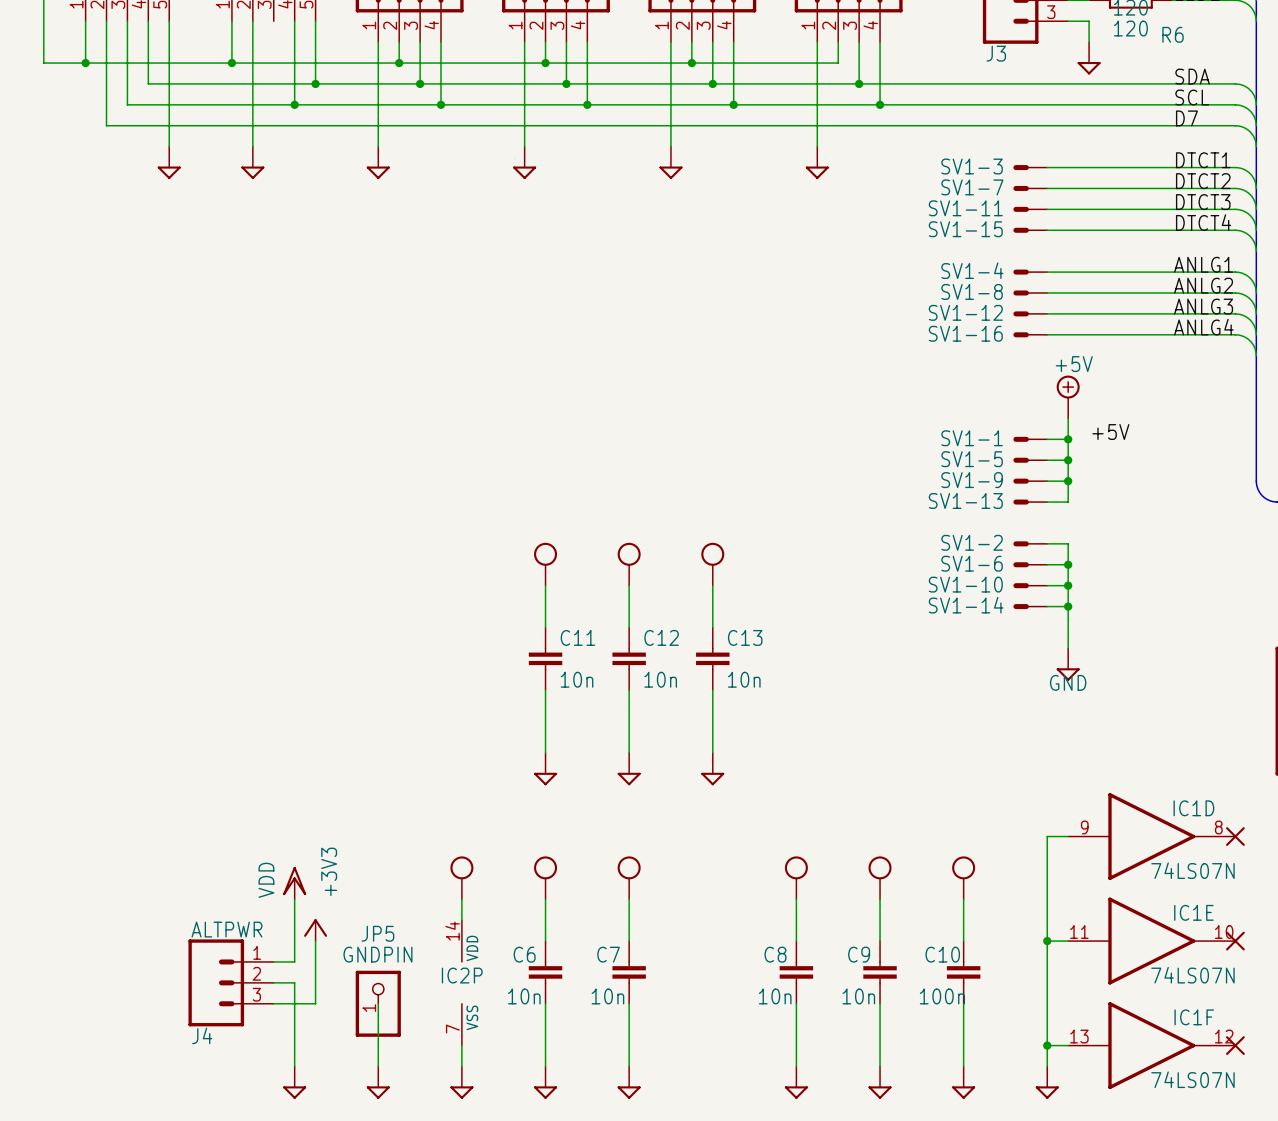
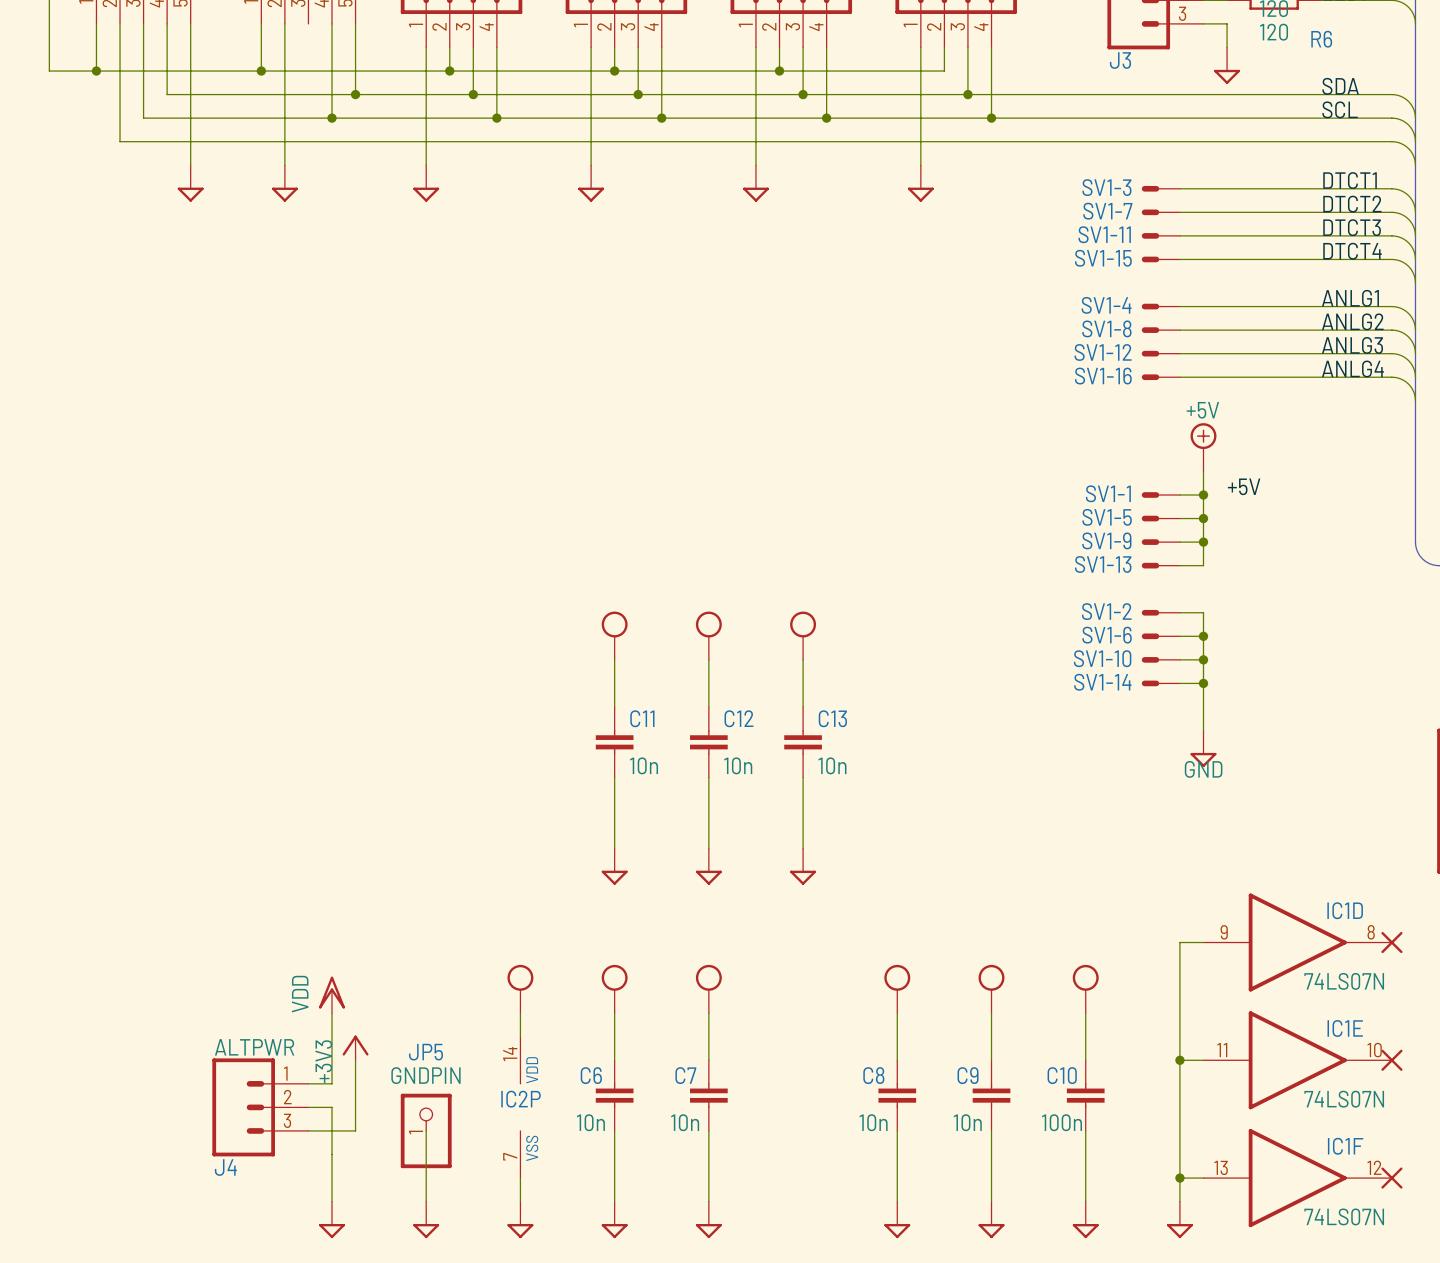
label: D7 (1186, 118) -> none
power symbol text position: +3V3 (329, 871) -> +3V3 (323, 1061)

